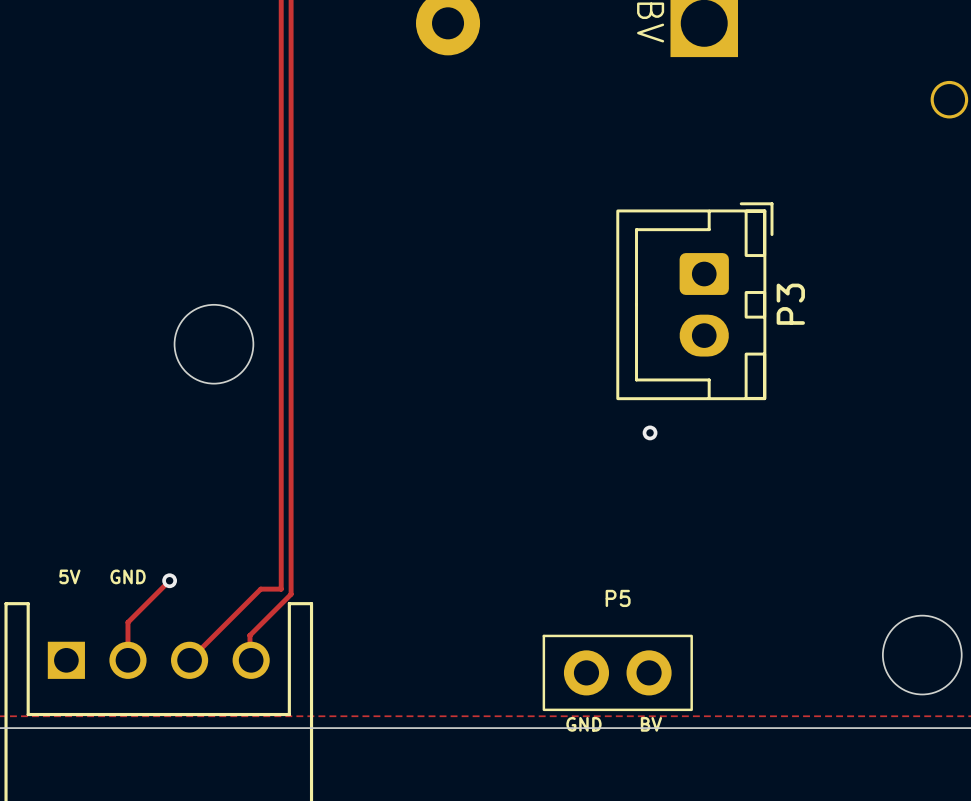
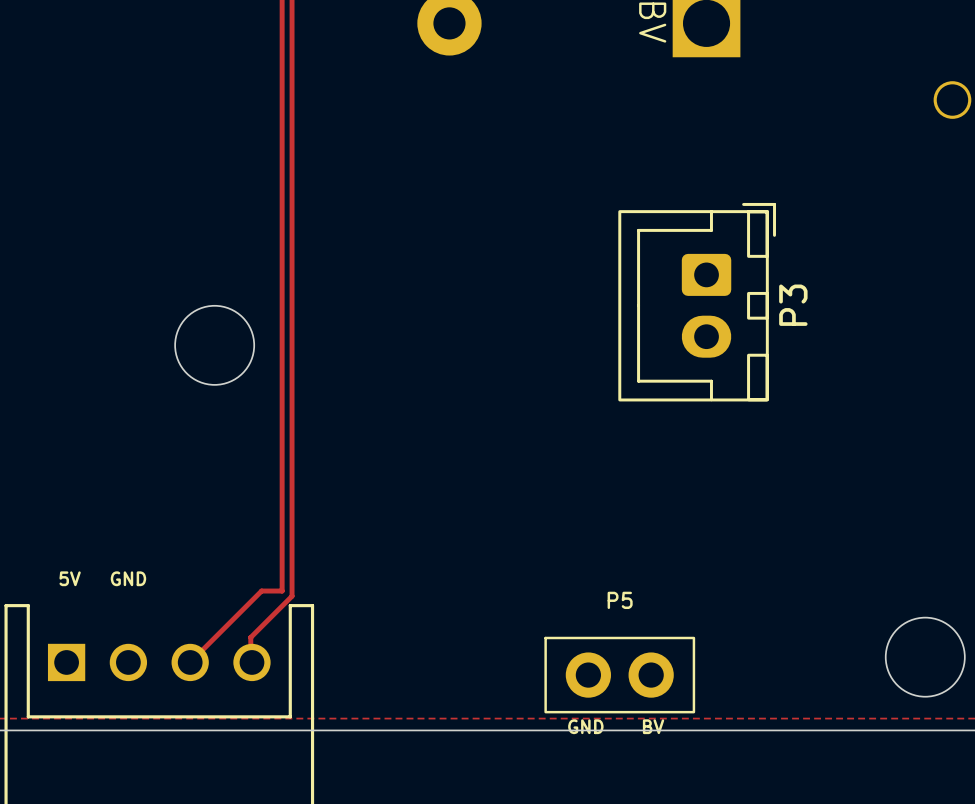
via: (650, 432) -> none
track: (169, 580) (127, 622) (127, 660) -> none
via: (169, 580) -> none

